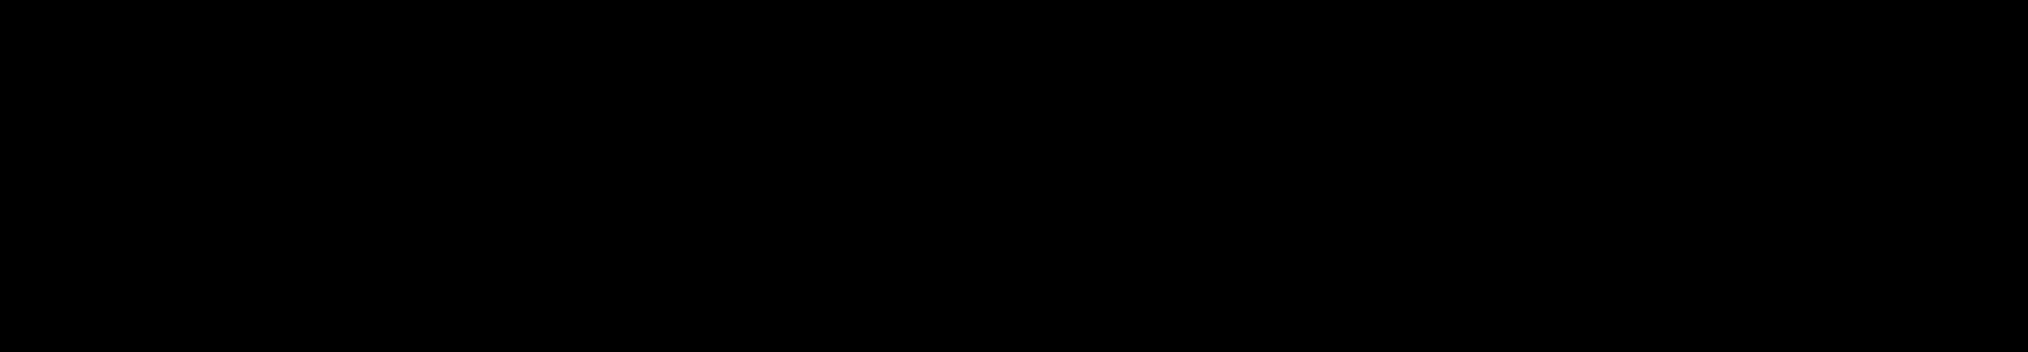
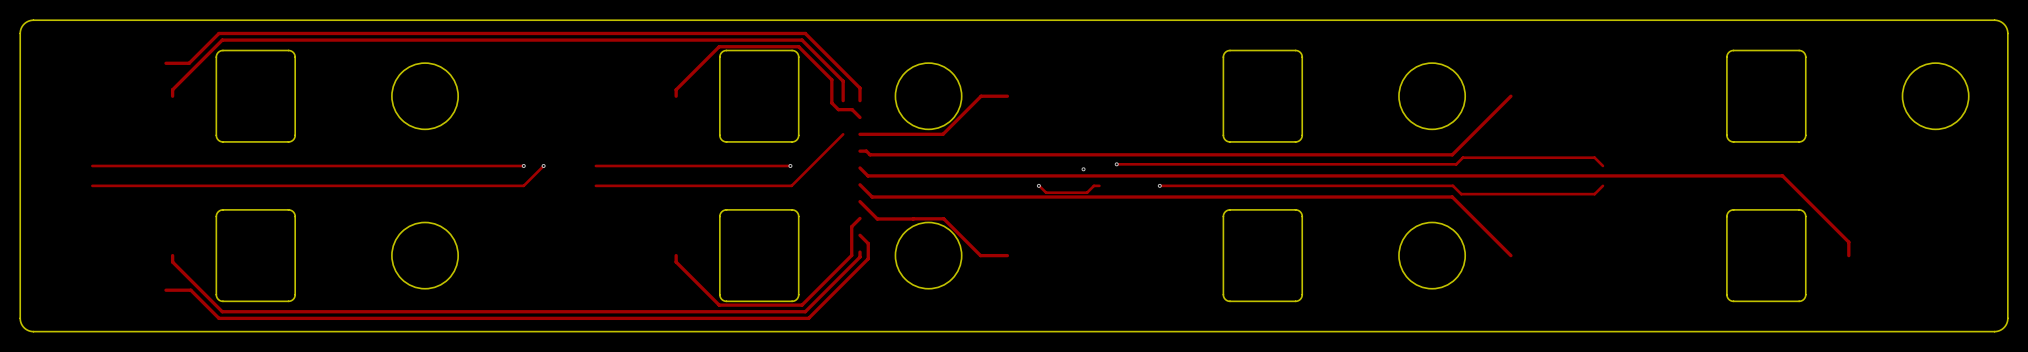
board edge: none -> (33, 20) (1996, 20) (2004, 25) (2007, 33) (2007, 319) (2003, 327) (1994, 331) (31, 331) (23, 326) (20, 318) (20, 33) (24, 24) (33, 20)
board edge: none -> (222, 50) (288, 50) (293, 53) (295, 135) (292, 140) (222, 141) (217, 139) (216, 56) (218, 51) (222, 50)
board edge: none -> (726, 50) (792, 50) (797, 53) (798, 135) (796, 140) (726, 141) (721, 139) (719, 56) (722, 51) (726, 50)
board edge: none -> (1230, 50) (1295, 50) (1300, 53) (1302, 135) (1299, 140) (1230, 141) (1224, 139) (1223, 56) (1225, 52) (1230, 50)
board edge: none -> (1733, 50) (1799, 50) (1804, 53) (1805, 135) (1803, 140) (1733, 141) (1728, 139) (1726, 56) (1729, 51) (1733, 50)
round board edge: none -> [391, 62, 459, 131]
round board edge: none -> [894, 62, 963, 131]
round board edge: none -> [1398, 62, 1467, 131]
round board edge: none -> [1901, 62, 1970, 131]
track: none -> (165, 63) (189, 63) (218, 33) (805, 33) (859, 88) (859, 100)
track: none -> (172, 96) (172, 89) (222, 40) (802, 40) (843, 81) (843, 100)
track: none -> (676, 96) (676, 89) (719, 46) (798, 46) (831, 79) (831, 103) (838, 109) (852, 109) (859, 117)
track: none -> (1007, 96) (981, 96) (943, 134) (859, 134)
track: none -> (1510, 96) (1452, 154) (870, 154) (866, 151) (859, 151)
track: none -> (843, 134) (791, 185) (595, 185)
track: none -> (1116, 164) (1456, 164) (1462, 157) (1594, 157) (1602, 165)
via: none -> (1116, 164)
track: none -> (92, 165) (523, 165)
via: none -> (523, 165)
track: none -> (543, 165) (523, 185) (92, 185)
via: none -> (543, 165)
track: none -> (595, 165) (790, 165)
via: none -> (790, 165)
track: none -> (859, 167) (867, 175) (1782, 175) (1848, 242) (1848, 255)
via: none -> (1083, 169)
track: none -> (859, 184) (872, 197) (1452, 197) (1510, 255)
track: none -> (1038, 185) (1046, 192) (1087, 192) (1093, 185) (1099, 185)
via: none -> (1038, 185)
track: none -> (1159, 185) (1452, 185) (1461, 194) (1594, 194) (1602, 185)
via: none -> (1159, 185)
track: none -> (859, 201) (877, 218) (943, 218) (980, 255) (1007, 255)
board edge: none -> (222, 209) (288, 209) (293, 212) (295, 294) (292, 299) (222, 301) (217, 298) (216, 215) (218, 211) (222, 209)
board edge: none -> (726, 209) (792, 209) (797, 212) (798, 294) (796, 299) (726, 301) (721, 298) (719, 215) (722, 211) (726, 209)
board edge: none -> (1230, 209) (1295, 209) (1300, 212) (1302, 294) (1299, 299) (1230, 301) (1224, 298) (1223, 215) (1225, 211) (1230, 209)
board edge: none -> (1733, 209) (1799, 209) (1804, 212) (1805, 294) (1803, 299) (1733, 301) (1728, 298) (1726, 215) (1729, 211) (1733, 209)
track: none -> (859, 218) (851, 226) (851, 255) (802, 305) (719, 305) (676, 262) (676, 255)
round board edge: none -> [391, 221, 459, 290]
round board edge: none -> [894, 221, 963, 290]
round board edge: none -> [1398, 221, 1467, 290]
track: none -> (859, 235) (868, 243) (868, 258) (808, 318) (218, 318) (190, 290) (165, 290)
track: none -> (859, 252) (859, 257) (805, 311) (222, 311) (172, 262) (172, 255)

